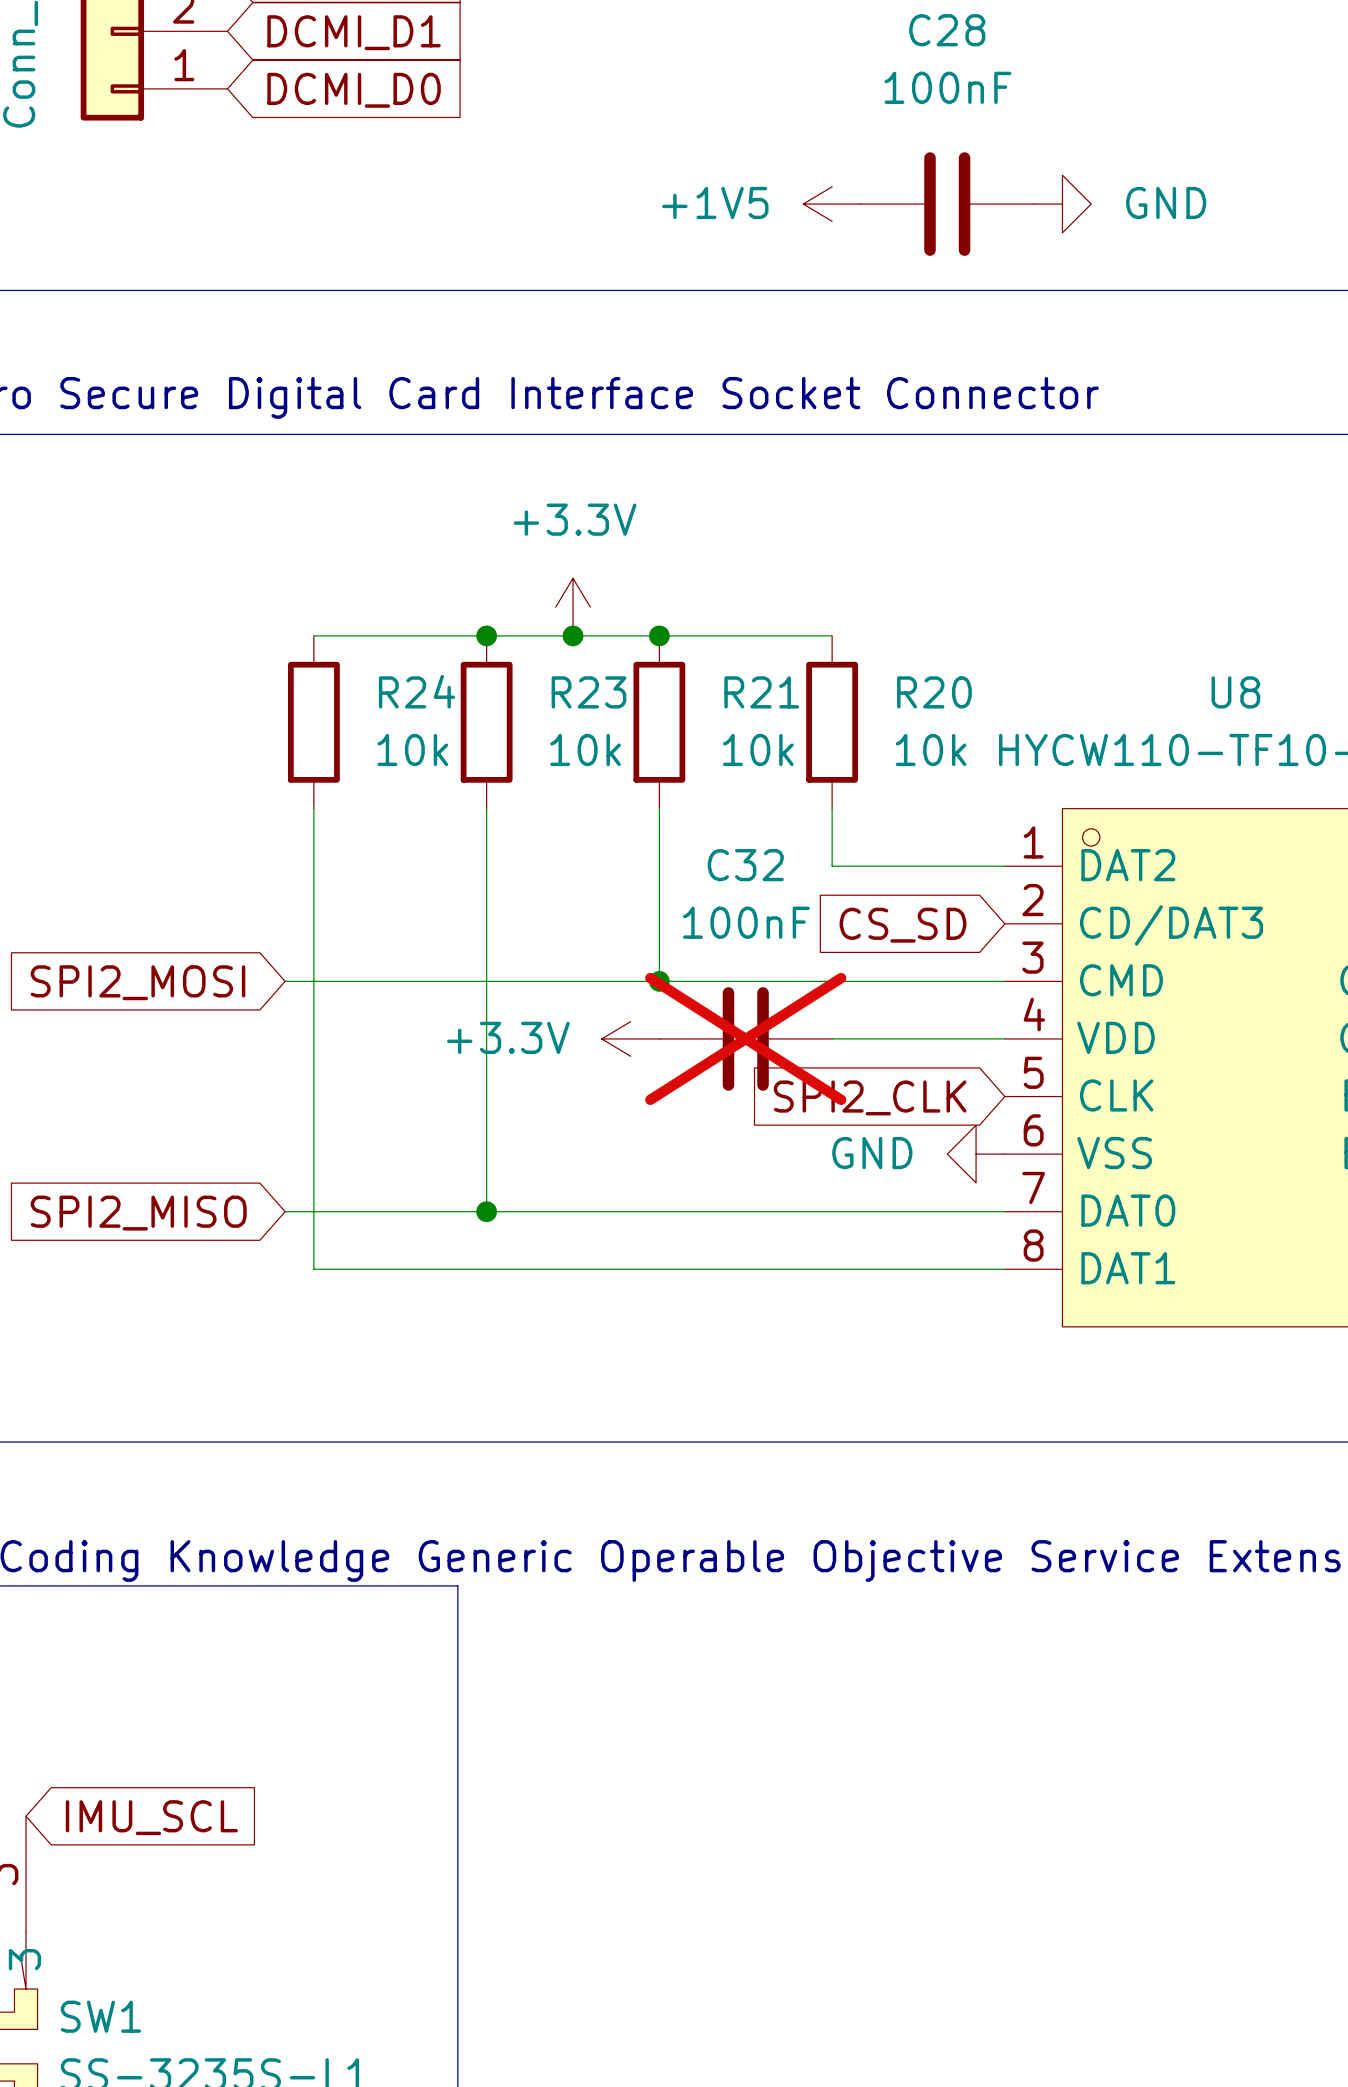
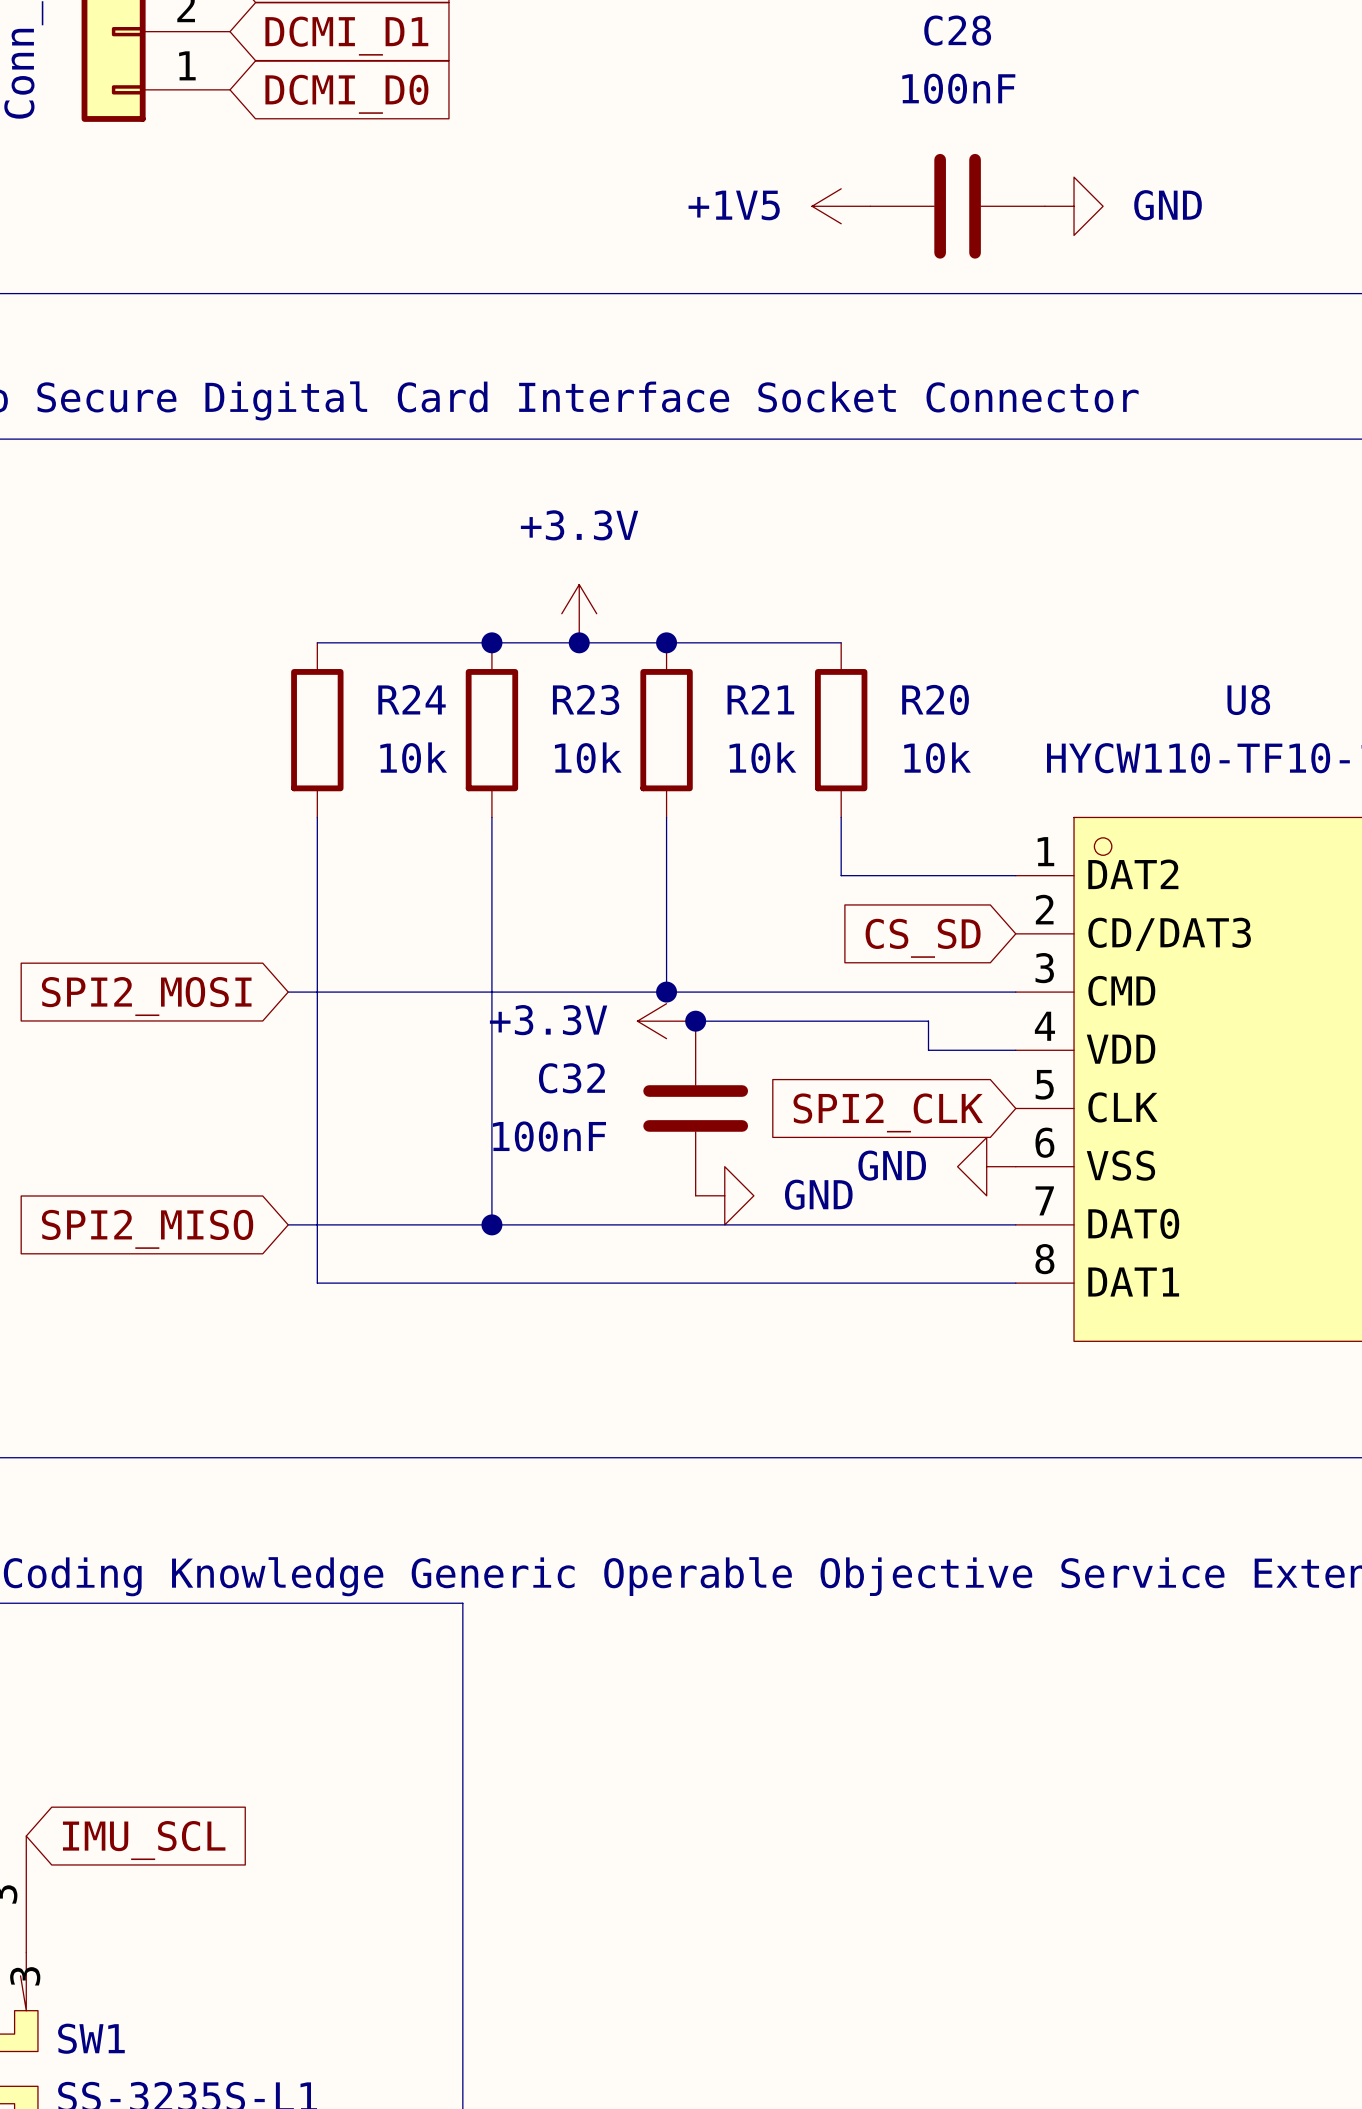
C32 name position: C32 (745, 865) -> C32 (571, 1078)
C32 value position: 100nF (746, 922) -> 100nF (549, 1136)
junction: none -> (695, 1021)
power symbol position: +3.3V (630, 1038) -> +3.3V (666, 1021)
C32 rotation: 0° (745, 1038) -> 90° clockwise (695, 1108)
C32 do-not-place cross: (745, 1038) -> none
wire: (832, 1038) (918, 1038) -> (695, 1021) (928, 1021) (928, 1050)
power symbol: none -> GND (724, 1195)

